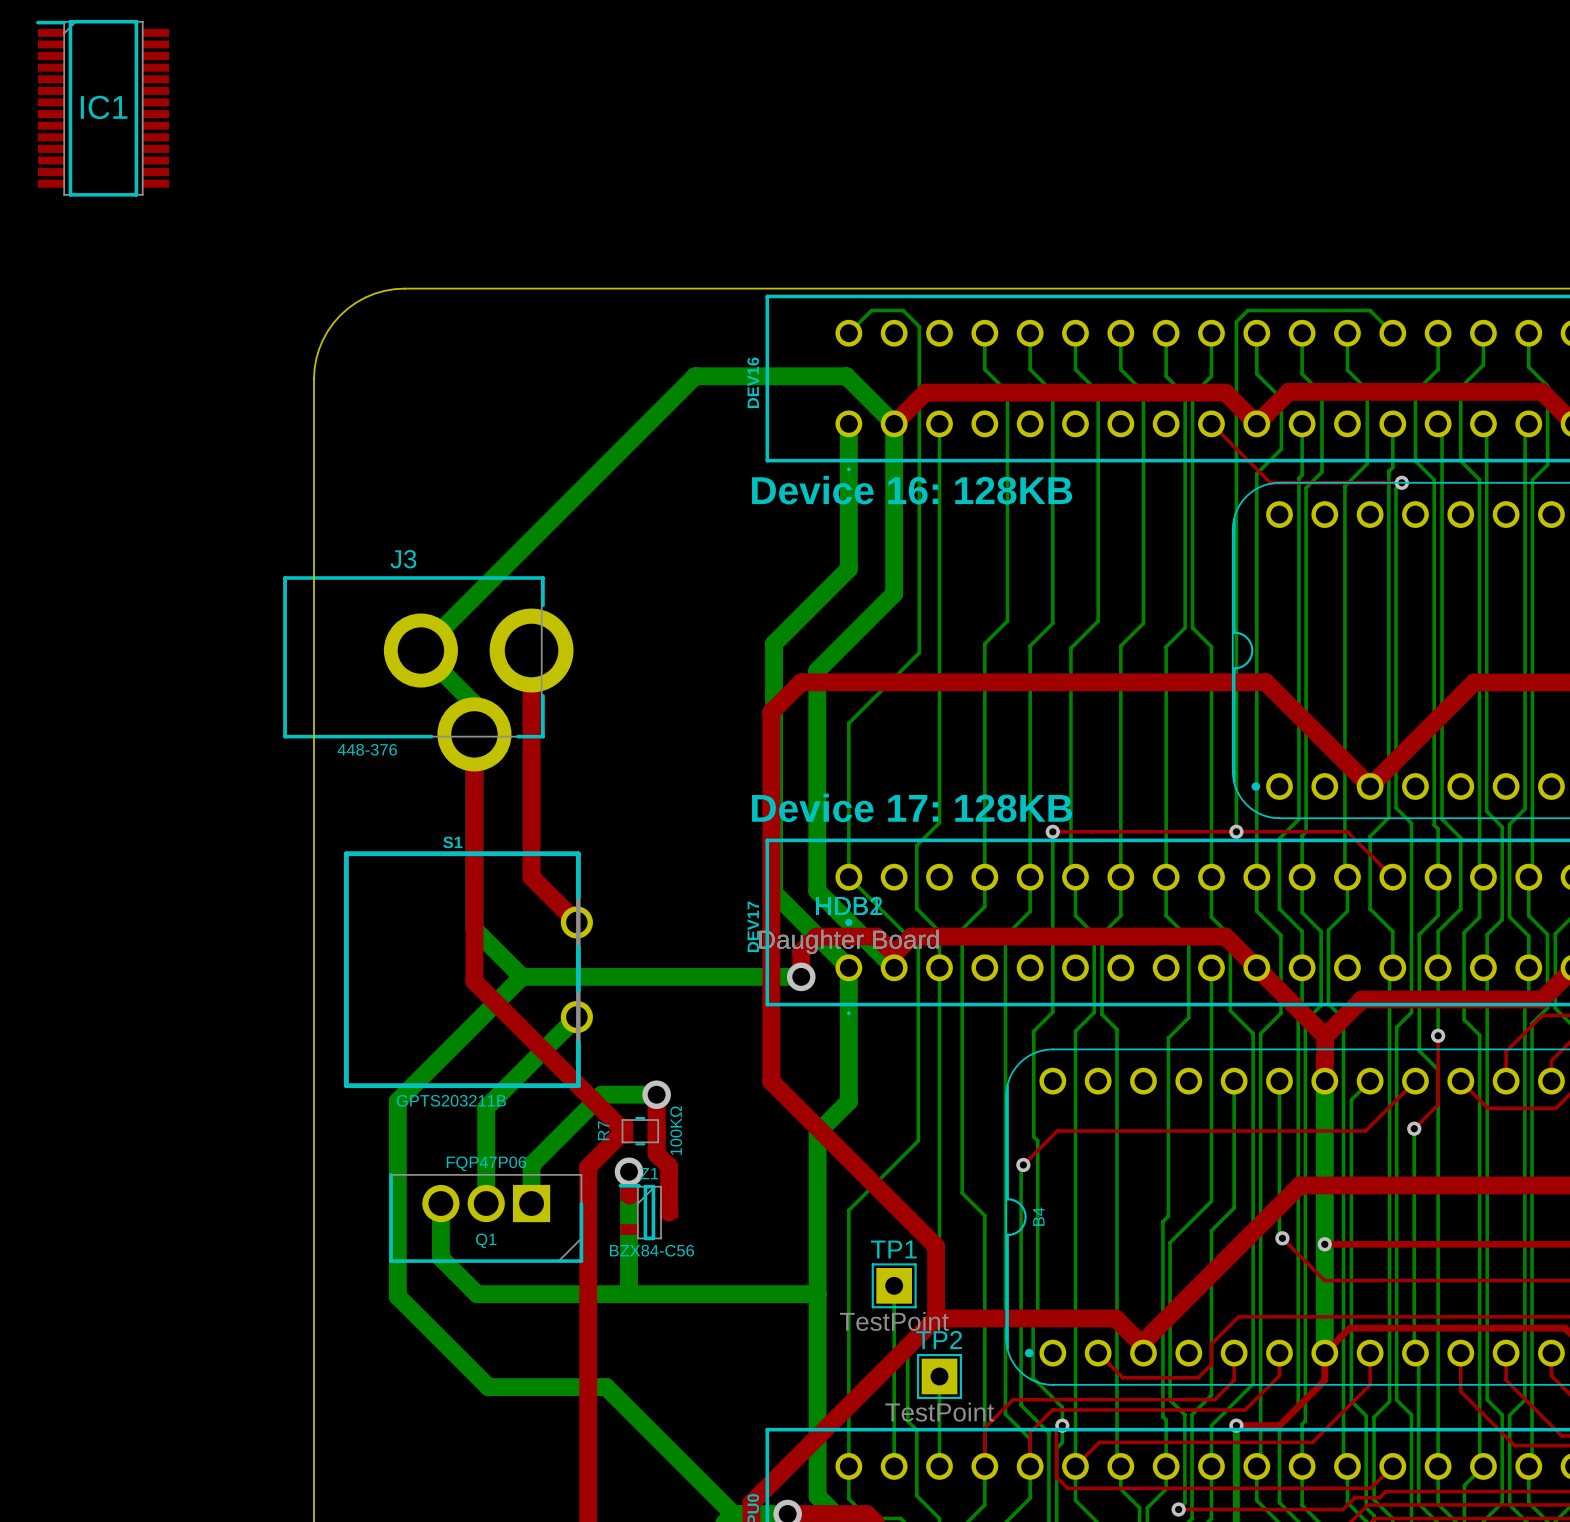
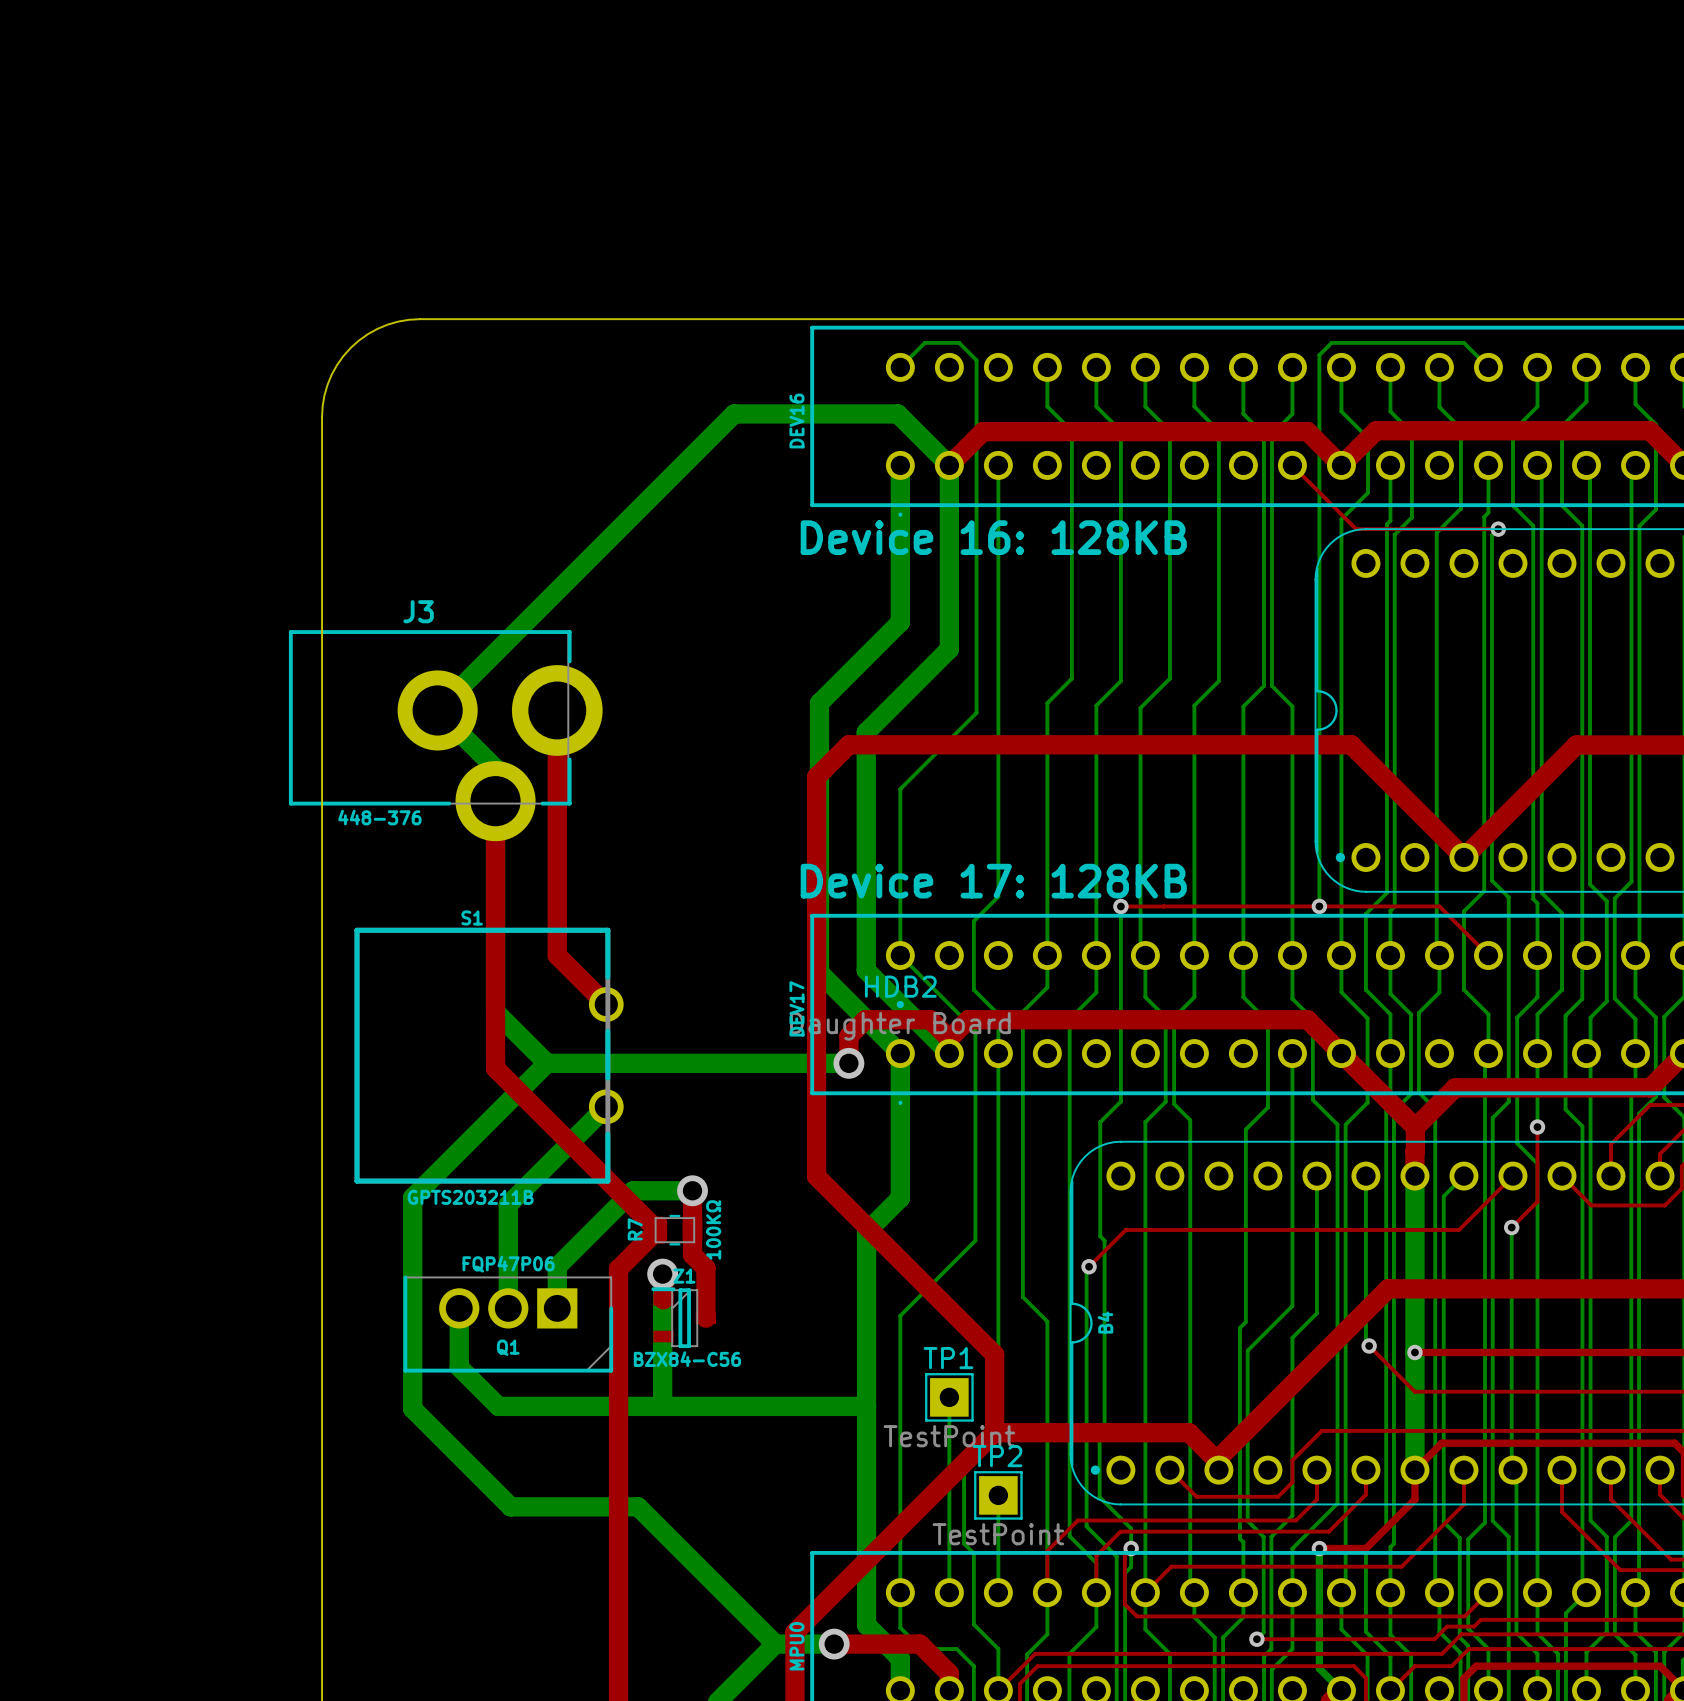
IC1: (102, 108) -> none
part: Daughter Board (848, 922) -> none

